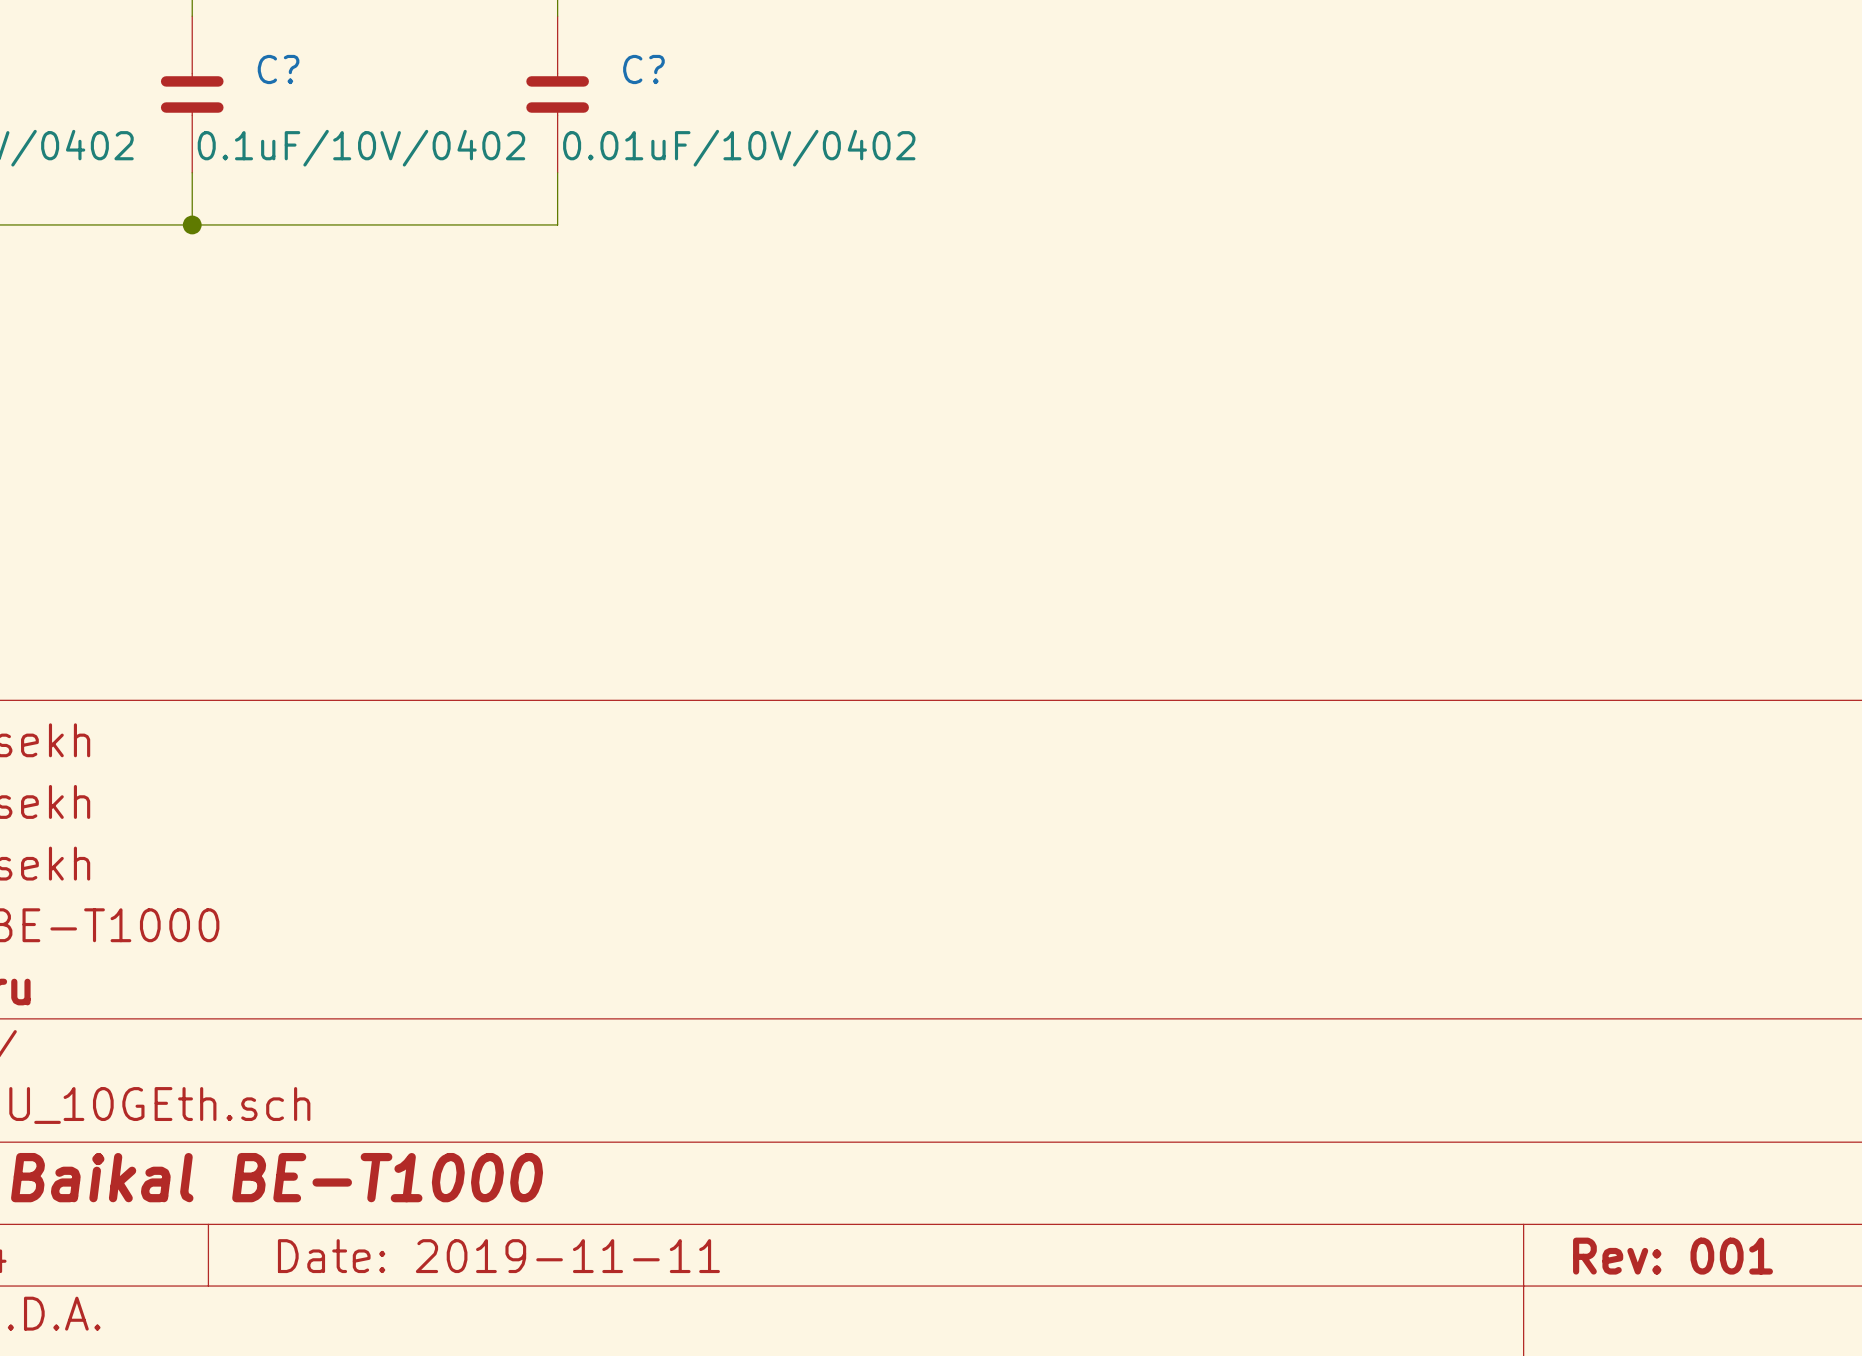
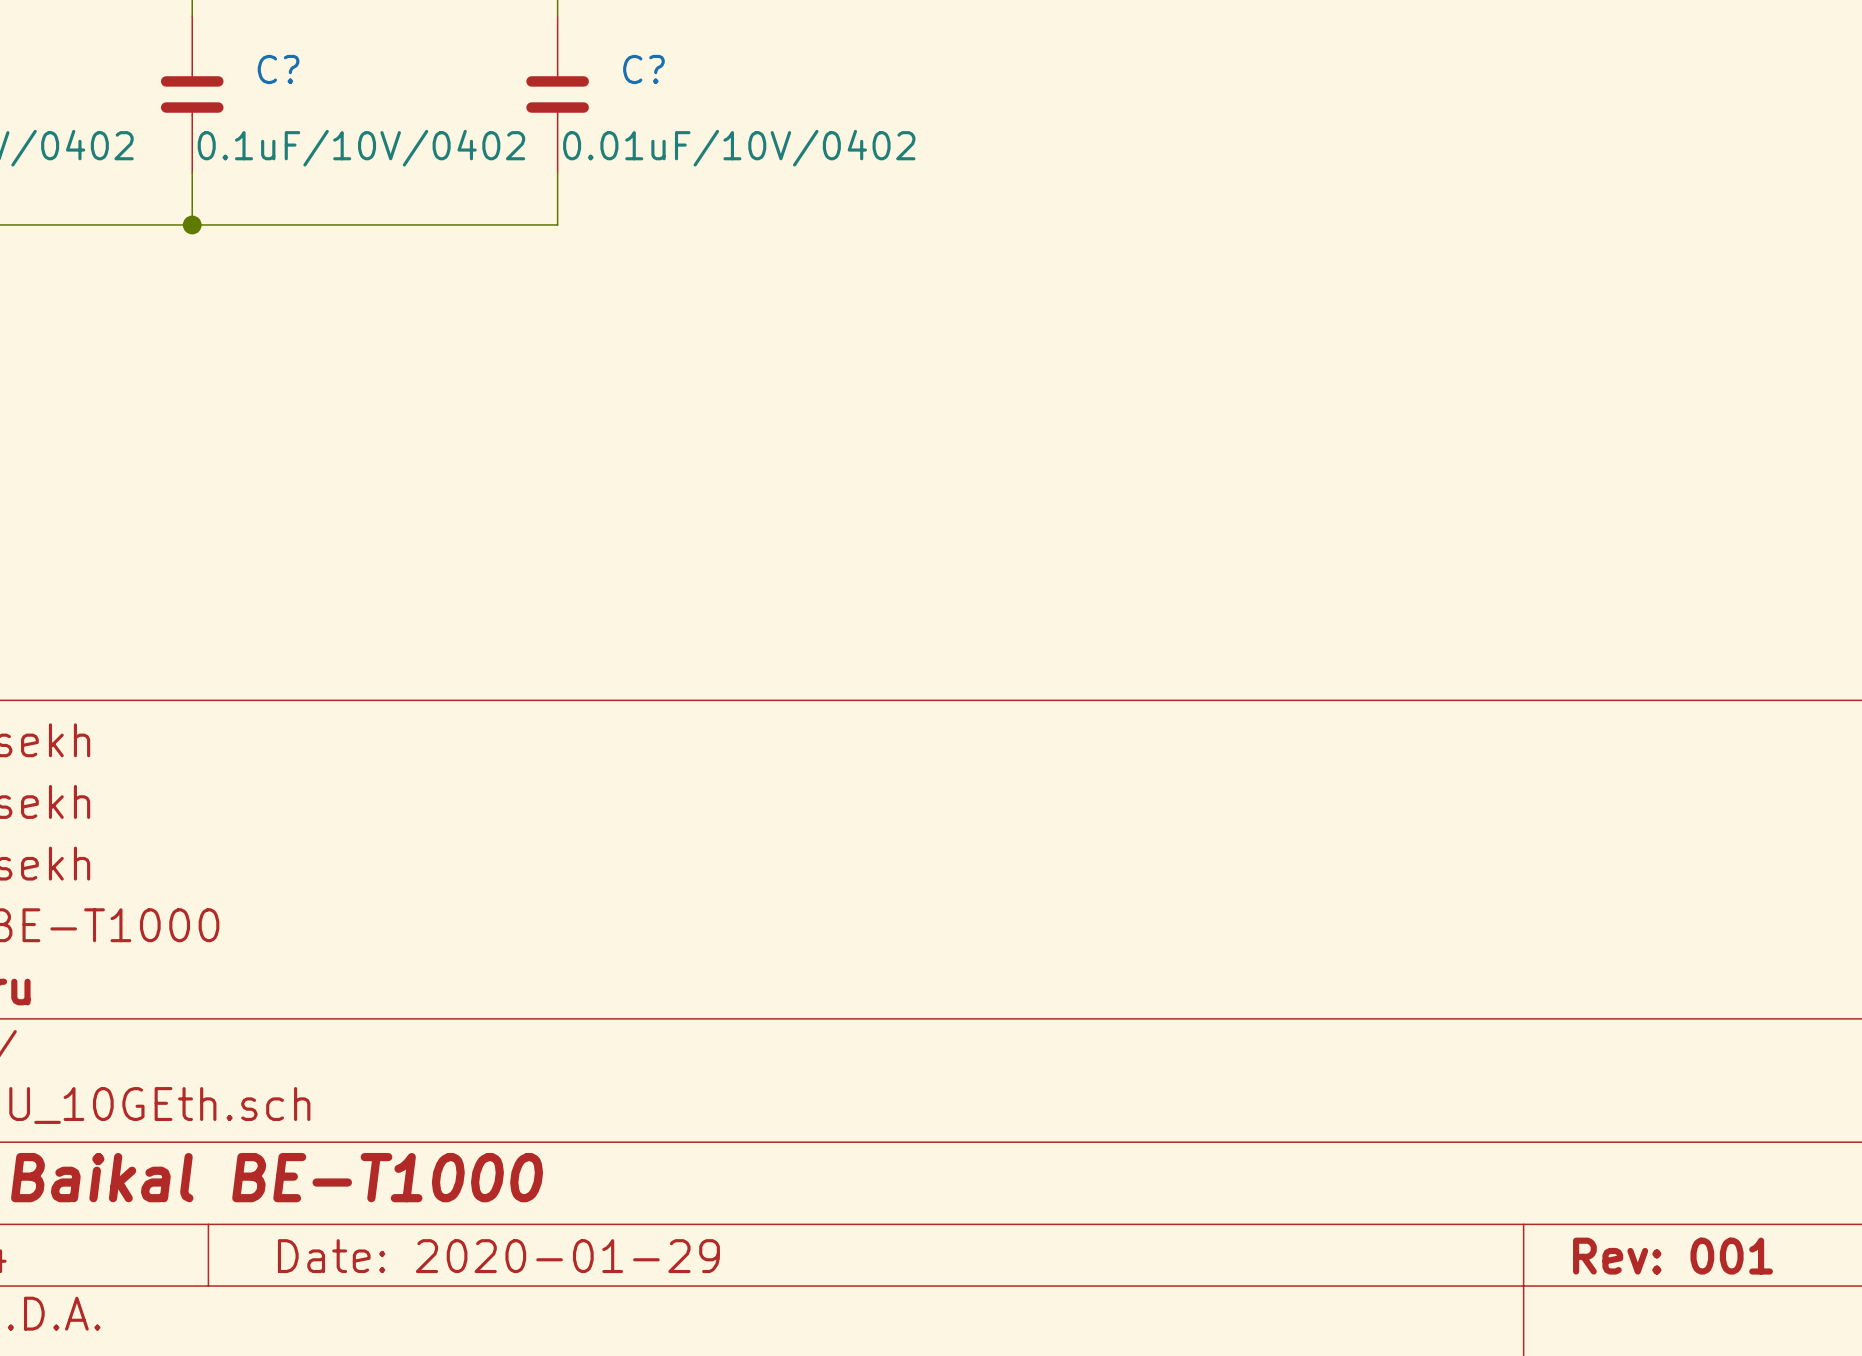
title block: Date: 2019-11-11 (498, 1256) -> Date: 2020-01-29 (498, 1256)

